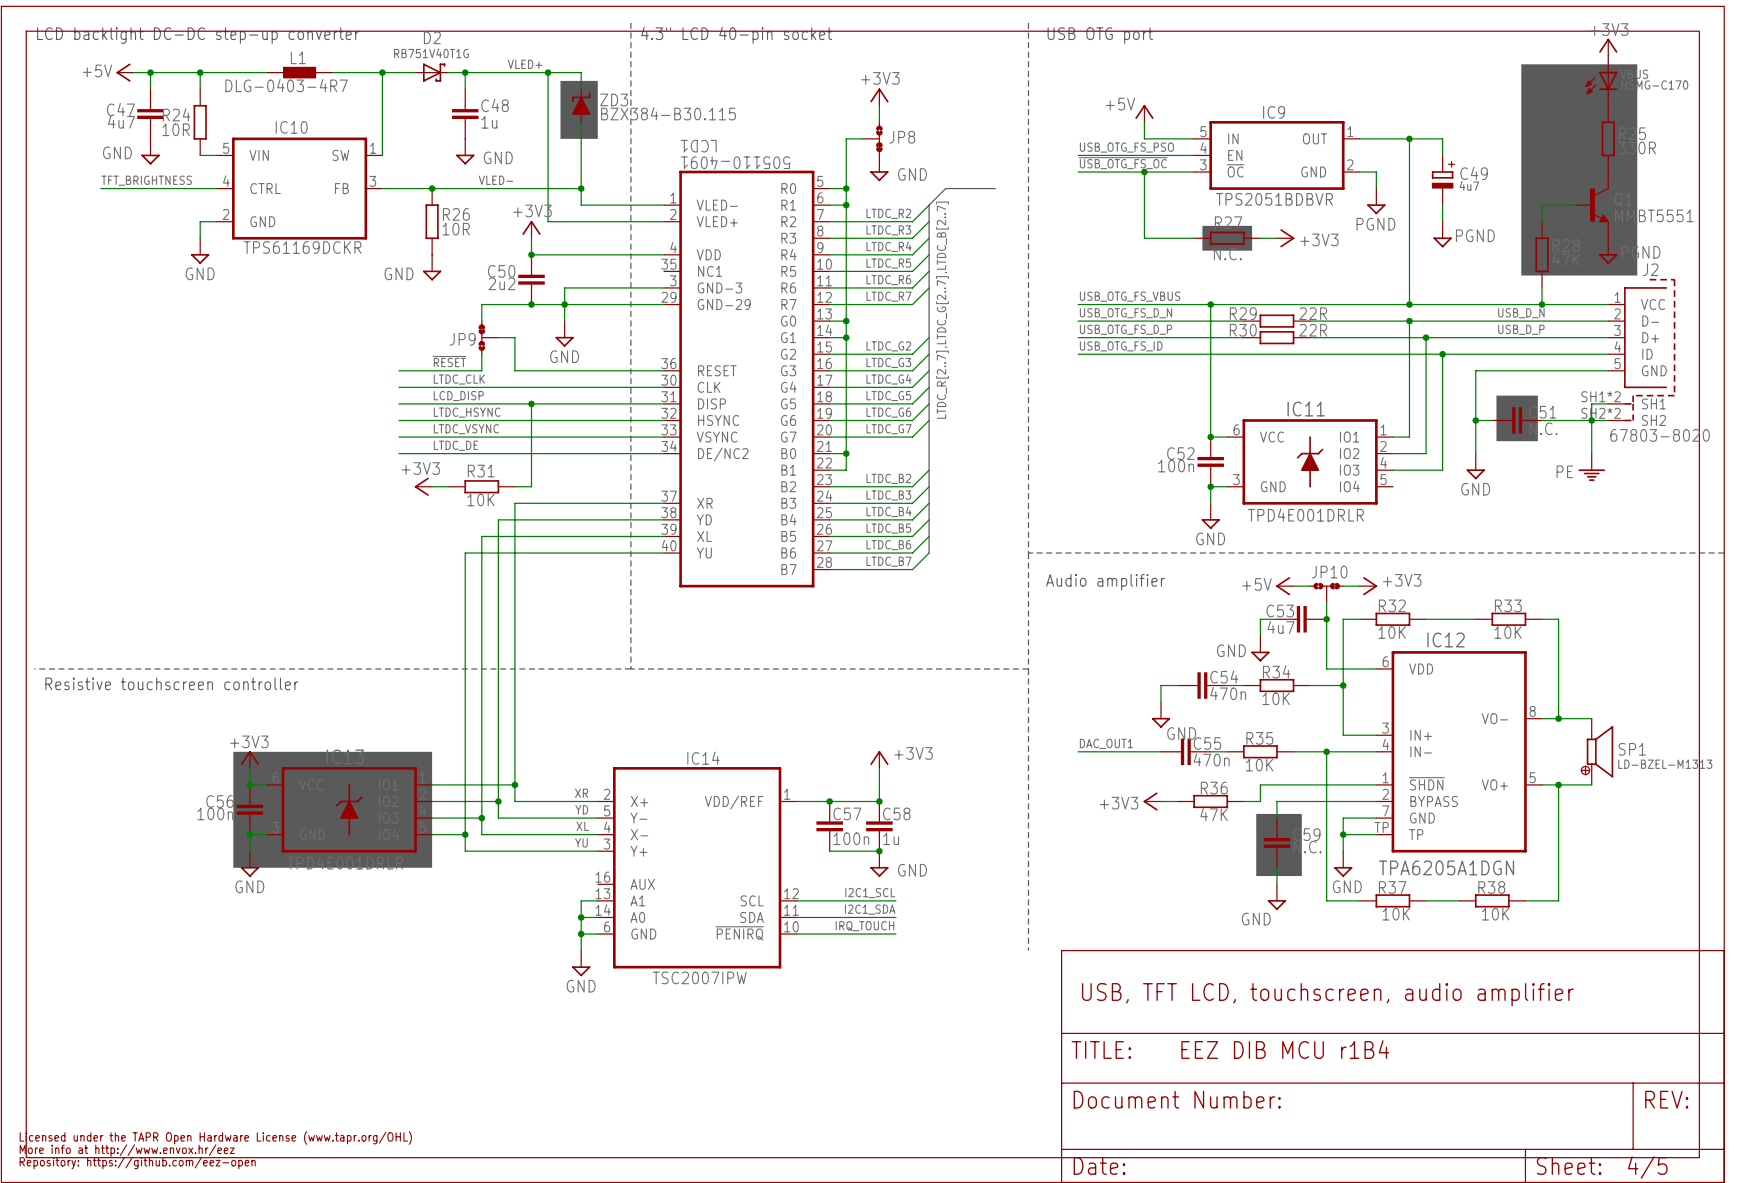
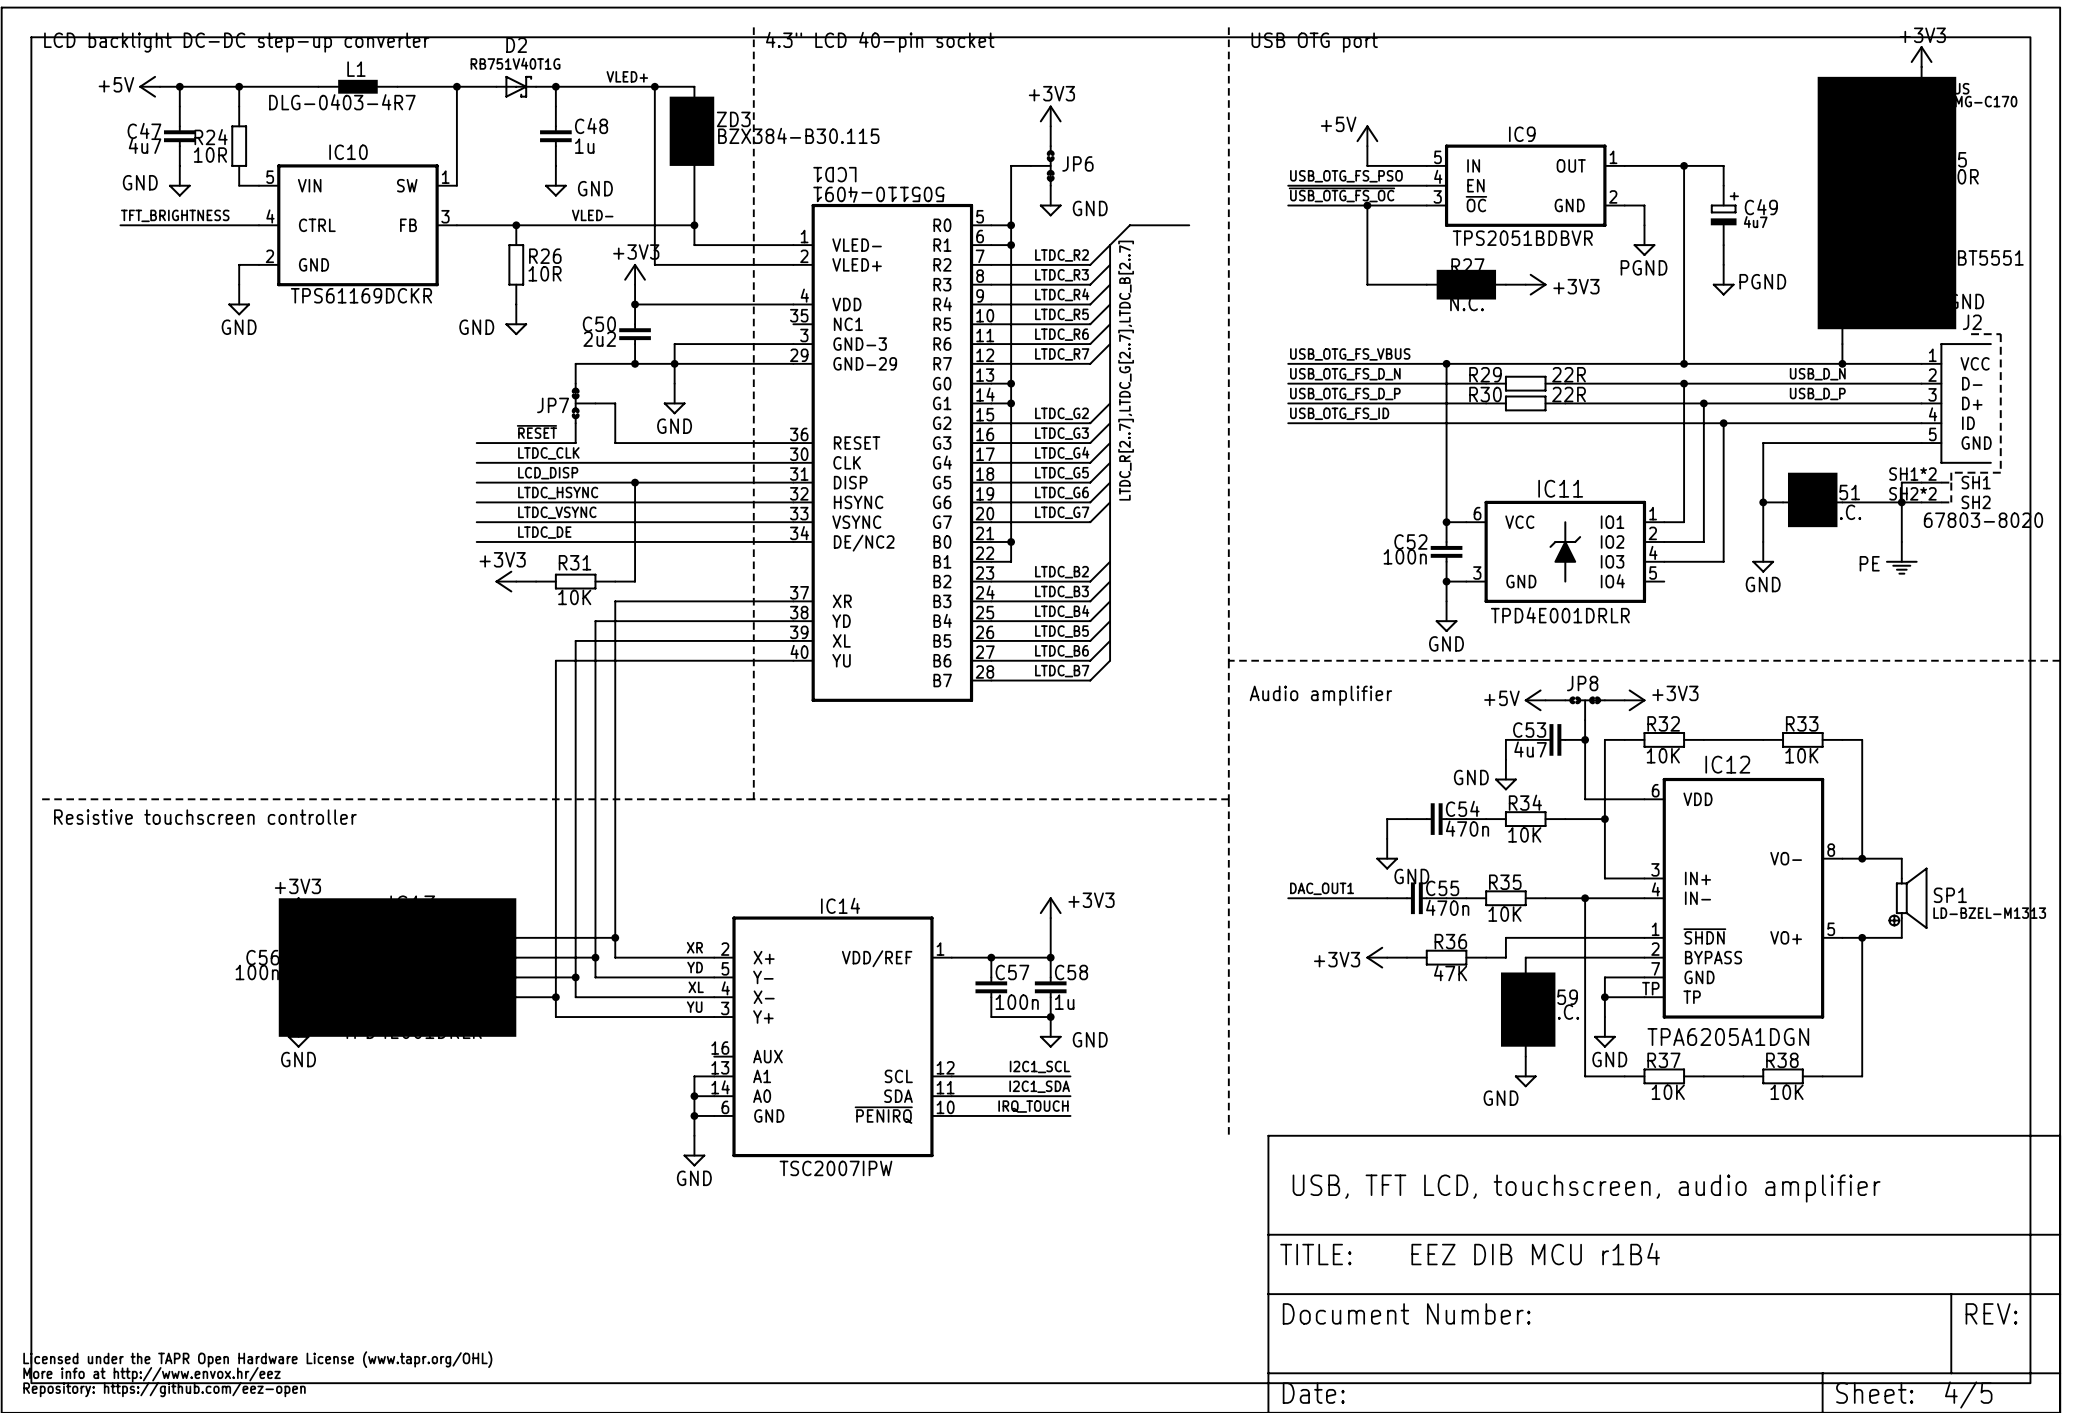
JP8 name: JP8 (902, 137) -> JP6 (1077, 163)
JP9 name: JP9 (462, 339) -> JP7 (553, 405)
JP10 name: JP10 (1329, 572) -> JP8 (1582, 683)

